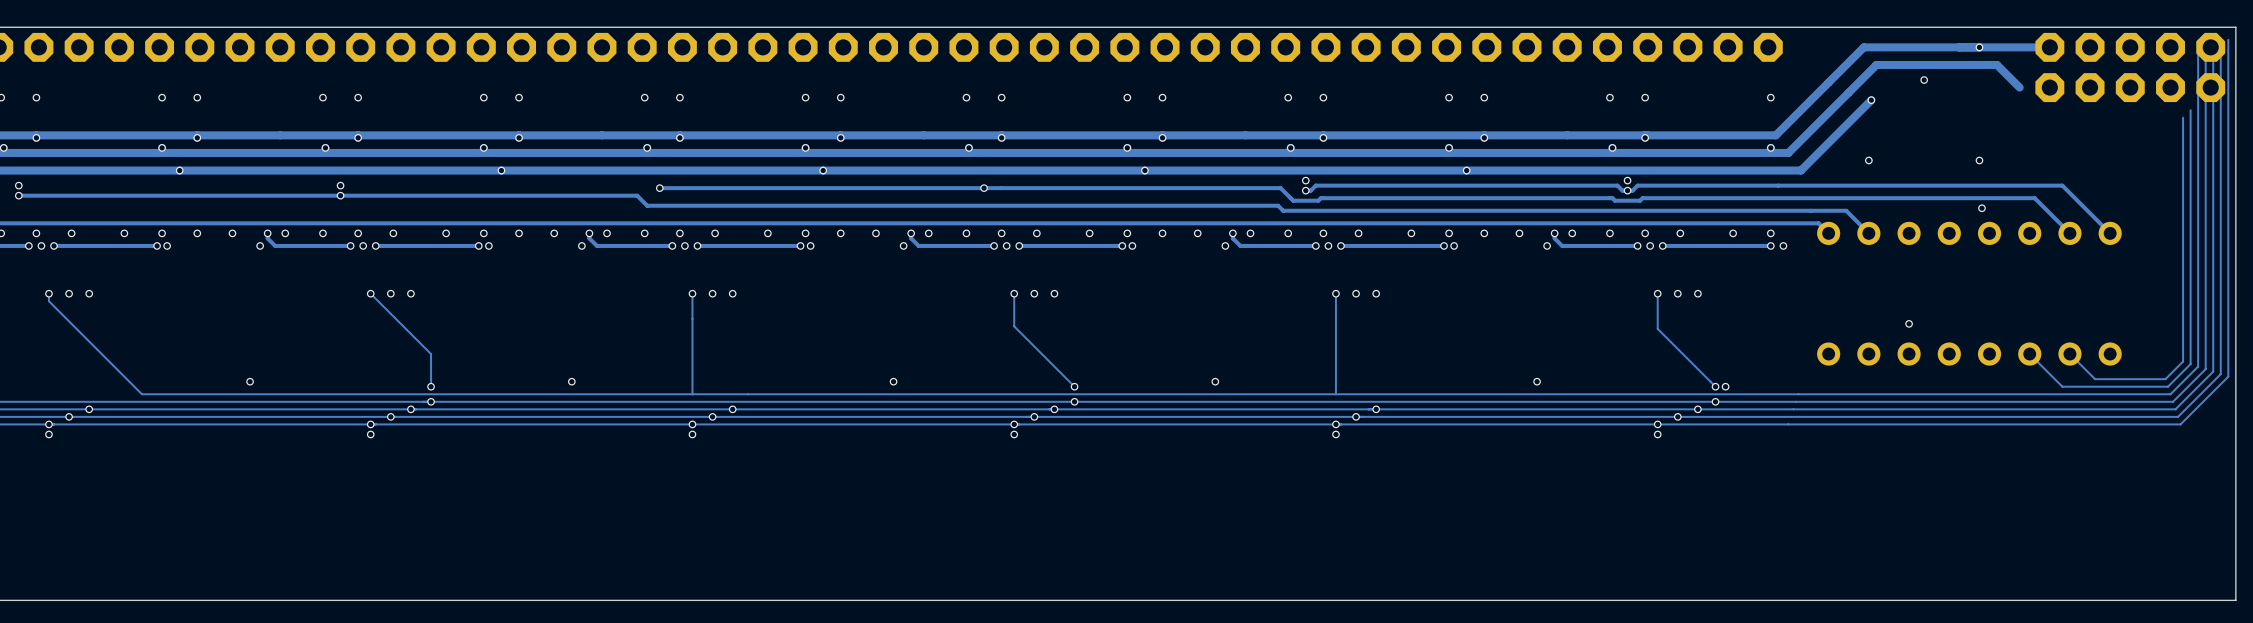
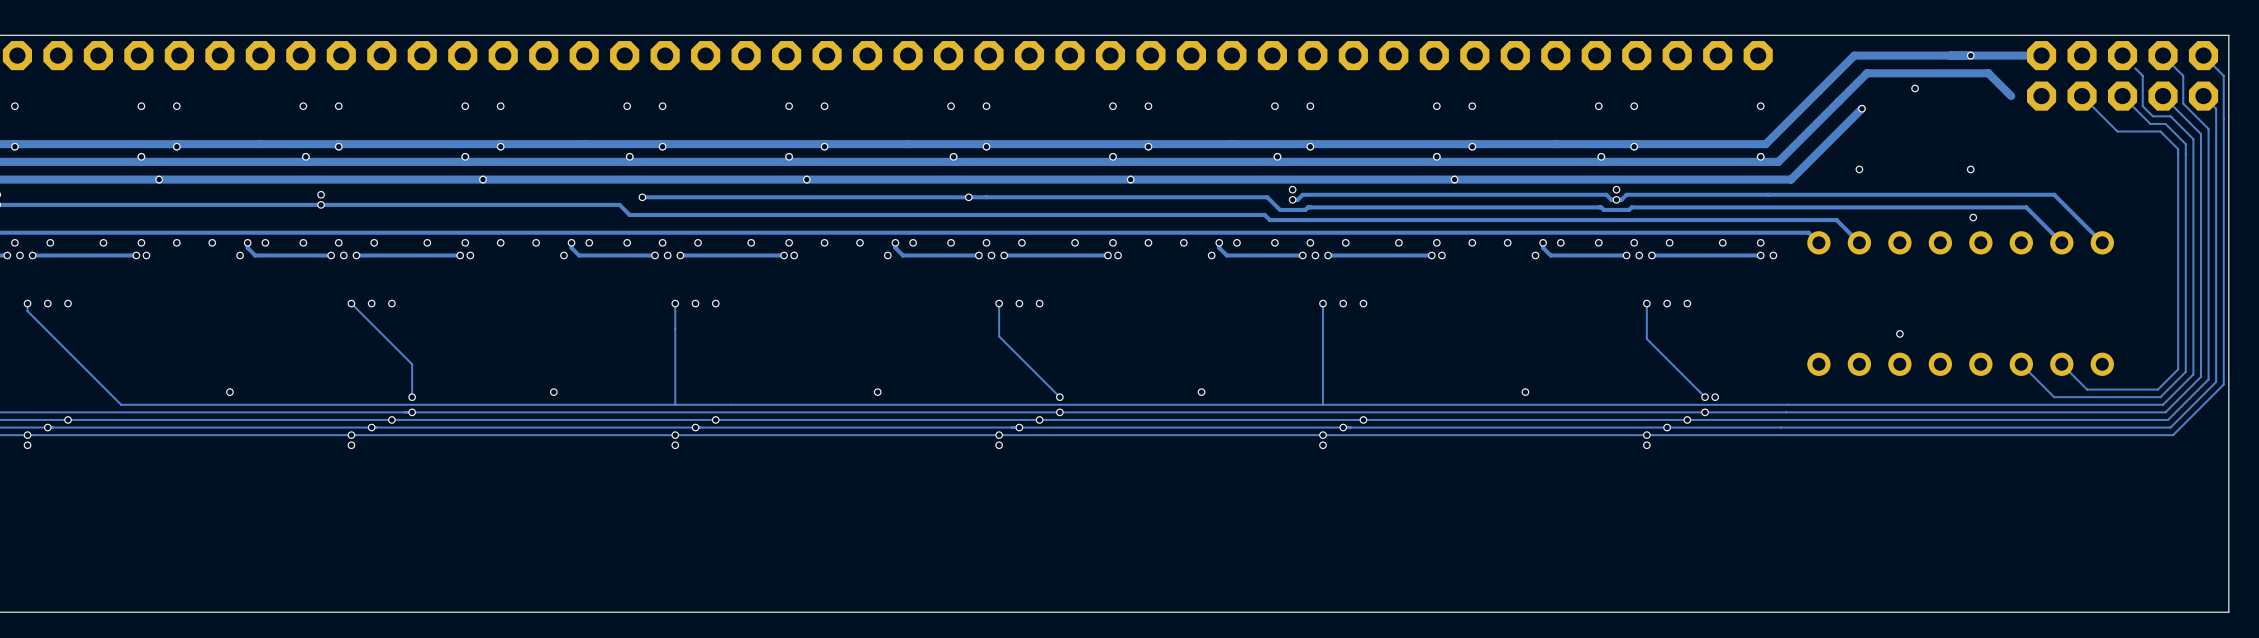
track: (2228, 39) (2228, 376) -> (2203, 55) (2223, 75) (2223, 384) (2221, 387)
track: (2198, 42) (2198, 366) -> (2135, 68) (2142, 75) (2142, 106) (2152, 116) (2170, 116) (2193, 139) (2193, 374) (2190, 376)
track: (2205, 42) (2205, 369) -> (2163, 96) (2200, 134) (2200, 376) (2198, 379)
track: (2213, 42) (2213, 371) -> (2163, 55) (2183, 75) (2183, 103) (2208, 128) (2208, 379) (2206, 381)
track: (2220, 42) (2220, 374) -> (2203, 96) (2216, 108) (2216, 381) (2213, 384)
track: (2190, 110) (2190, 364) -> (2122, 96) (2150, 123) (2165, 123) (2185, 144) (2185, 371) (2183, 374)
track: (2183, 117) (2183, 361) -> (2082, 96) (2117, 131) (2160, 131) (2178, 149) (2178, 369) (2175, 371)

